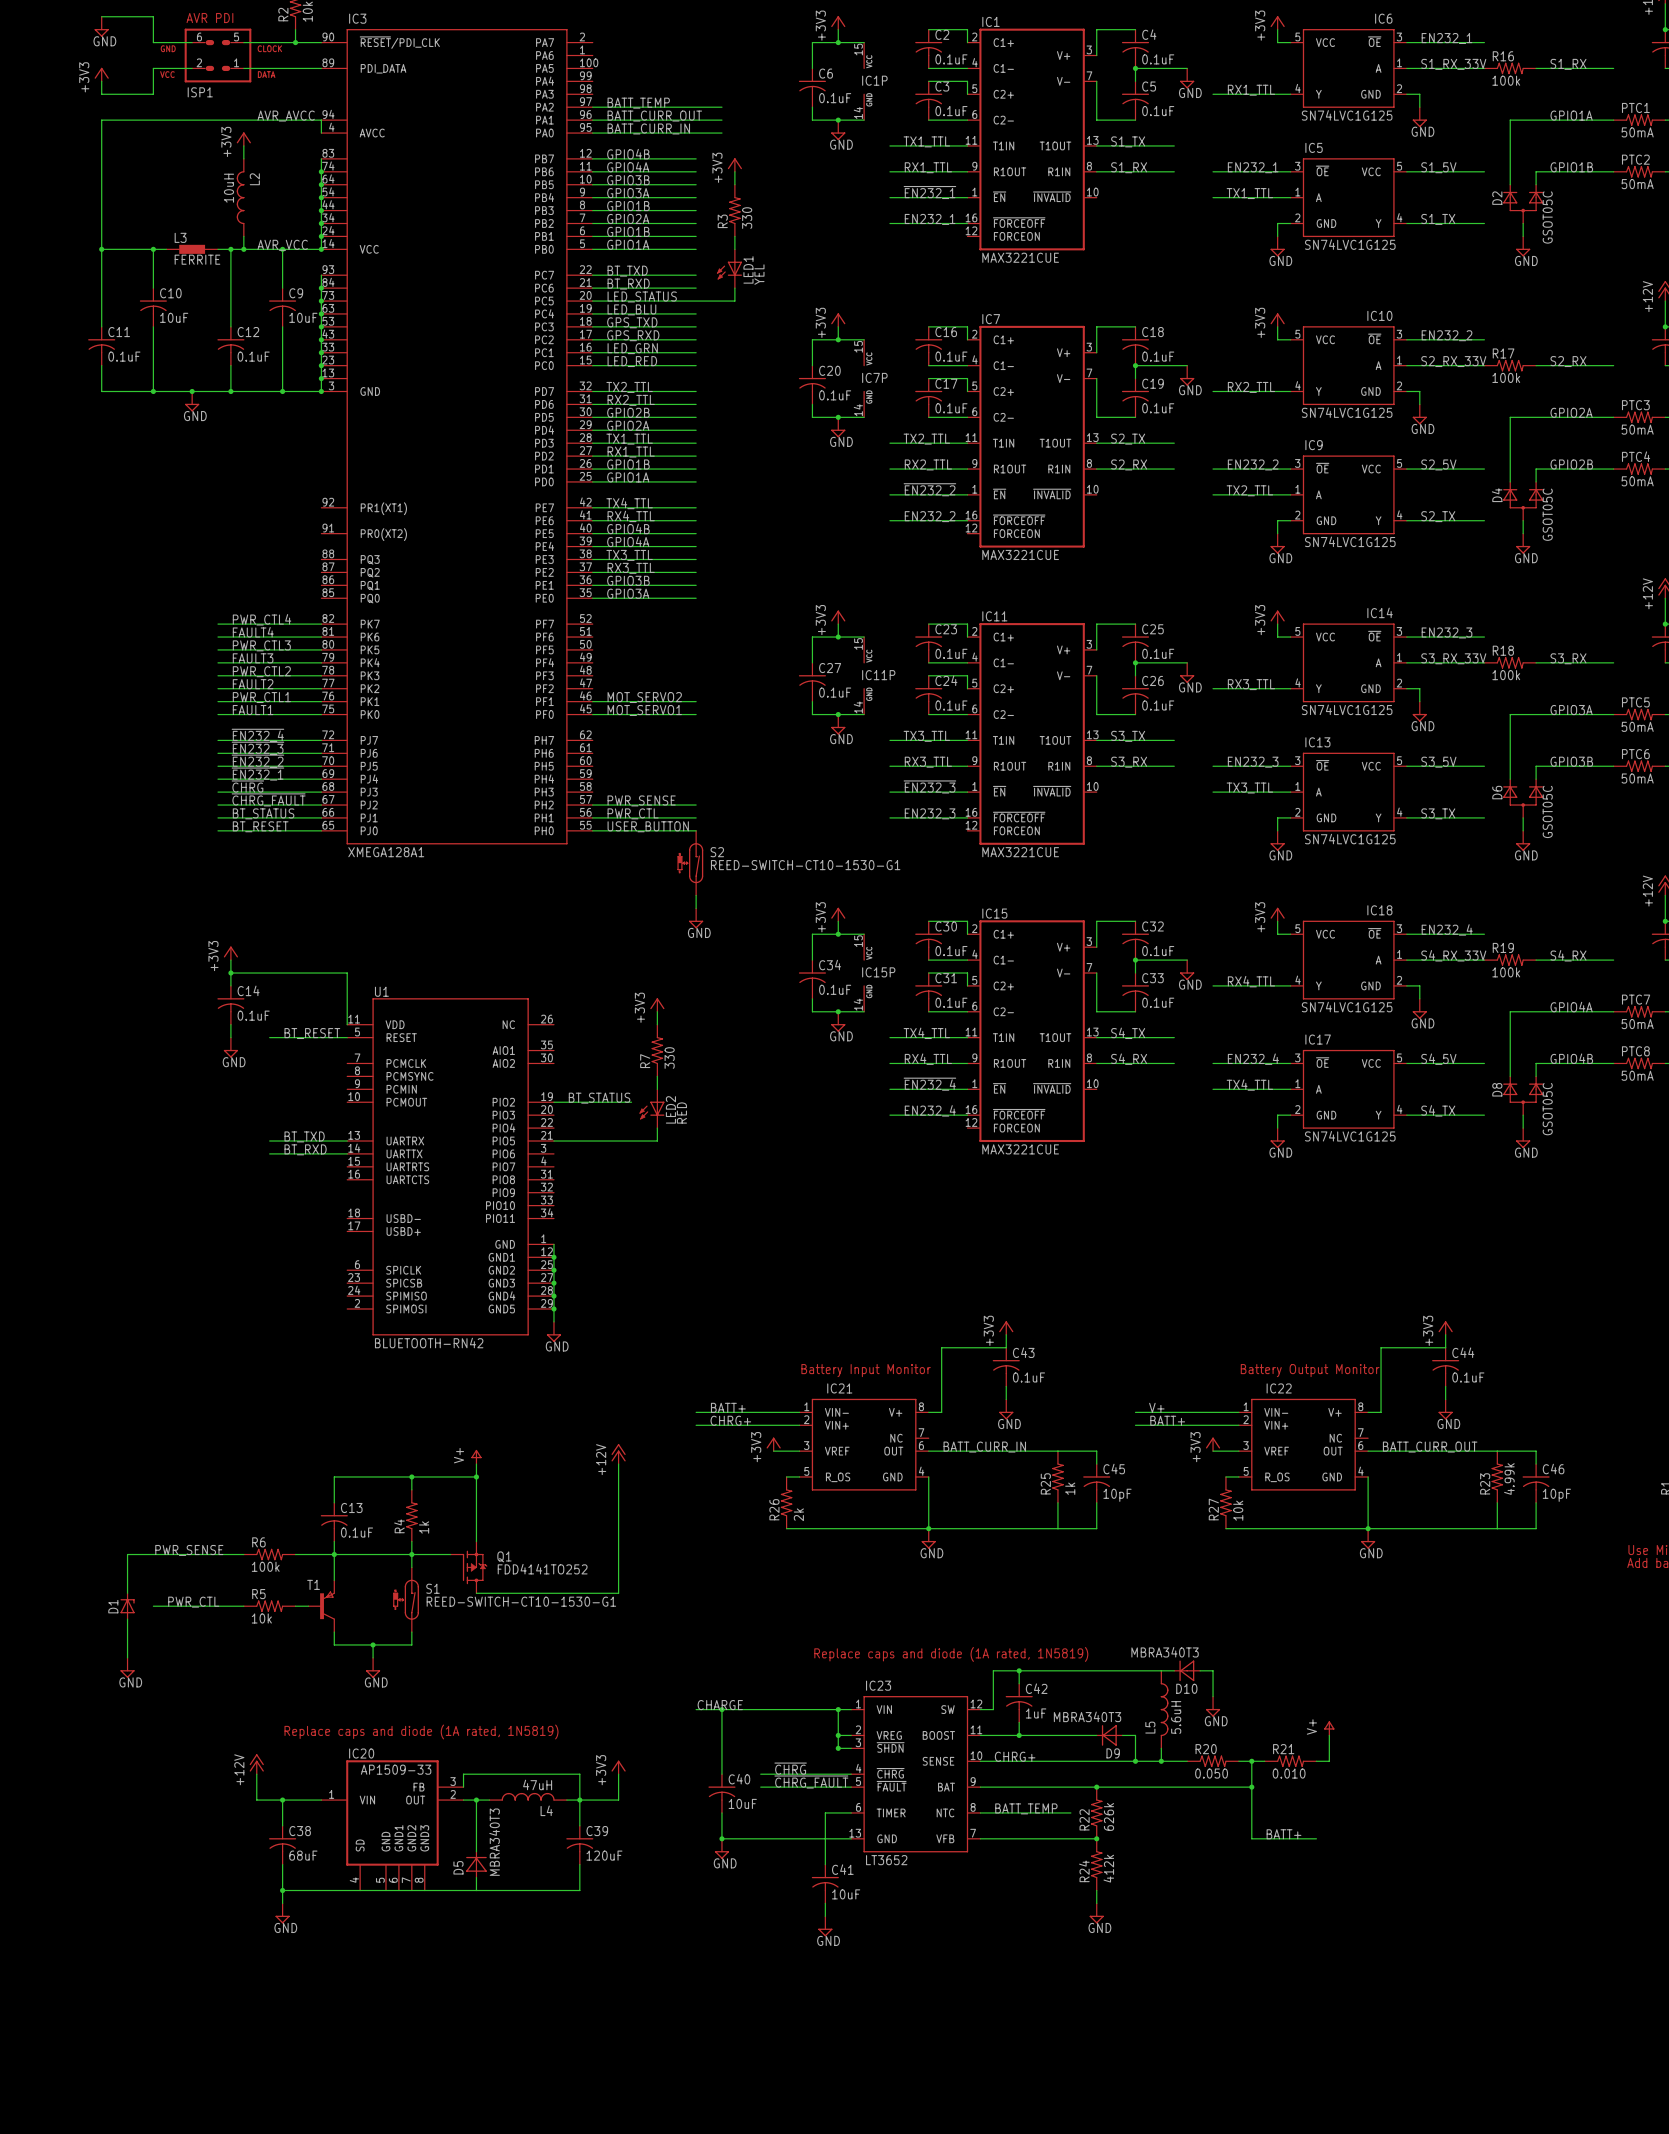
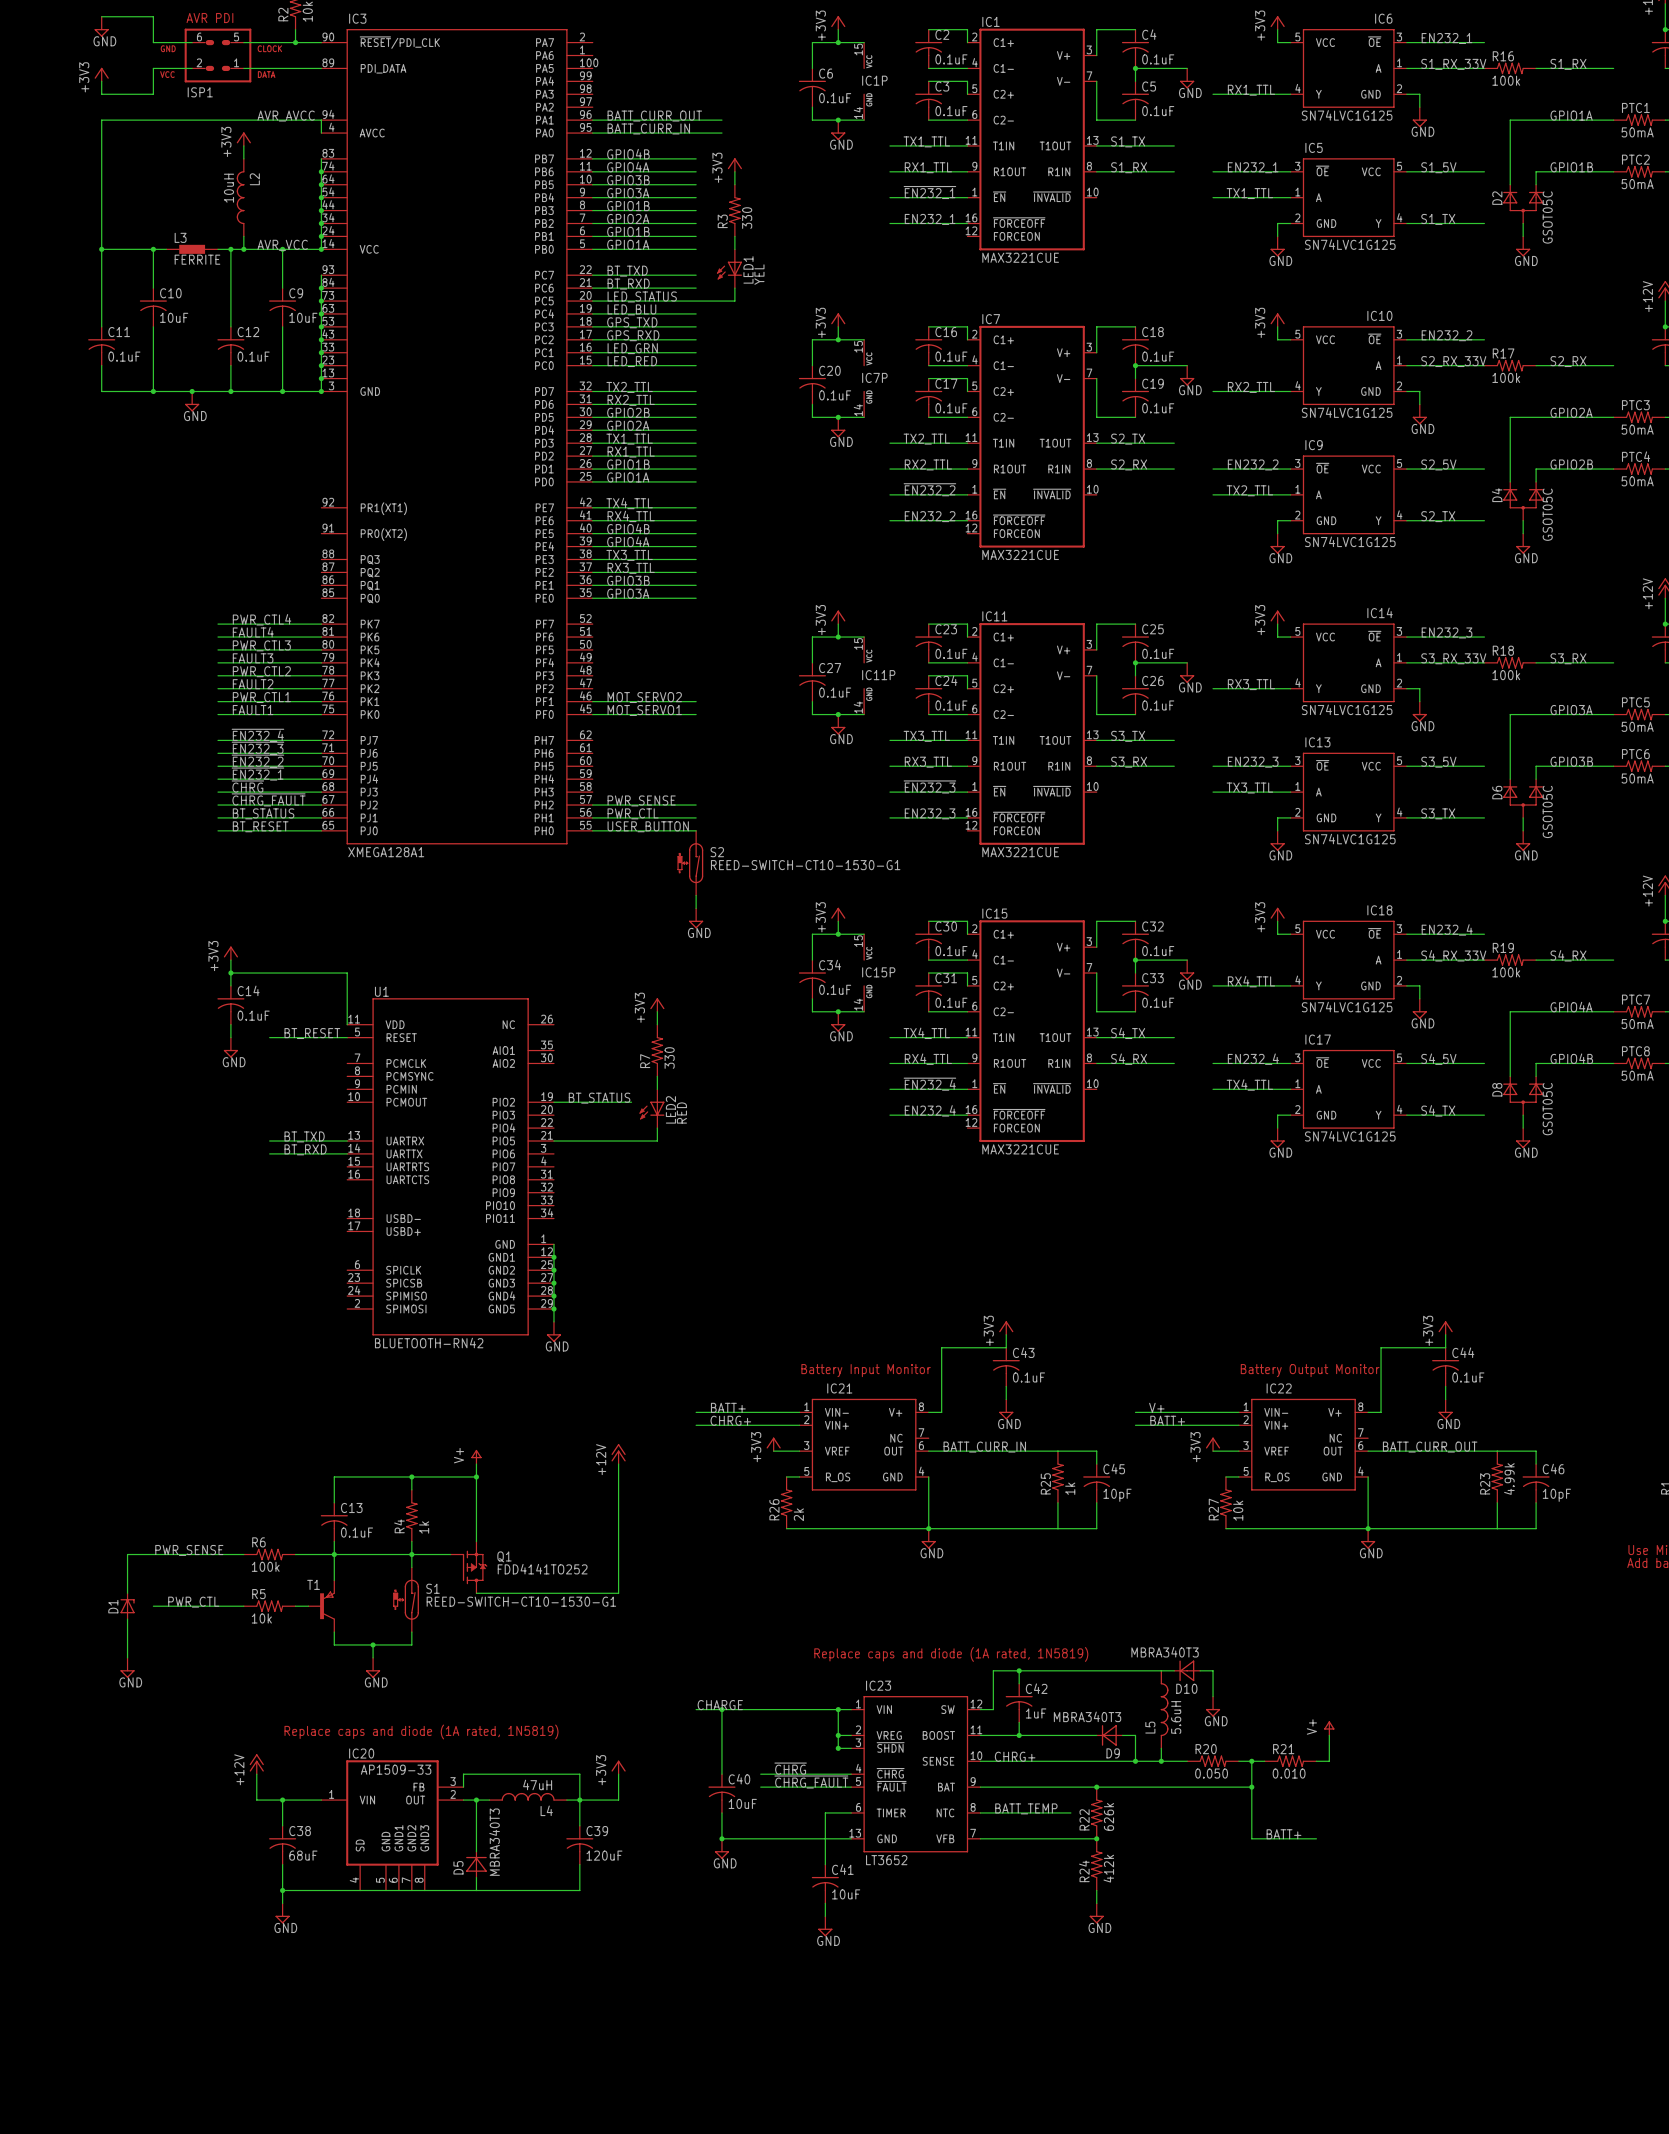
label: BATT_TEMP (638, 103) -> none
wire: (592, 107) (721, 107) -> none

